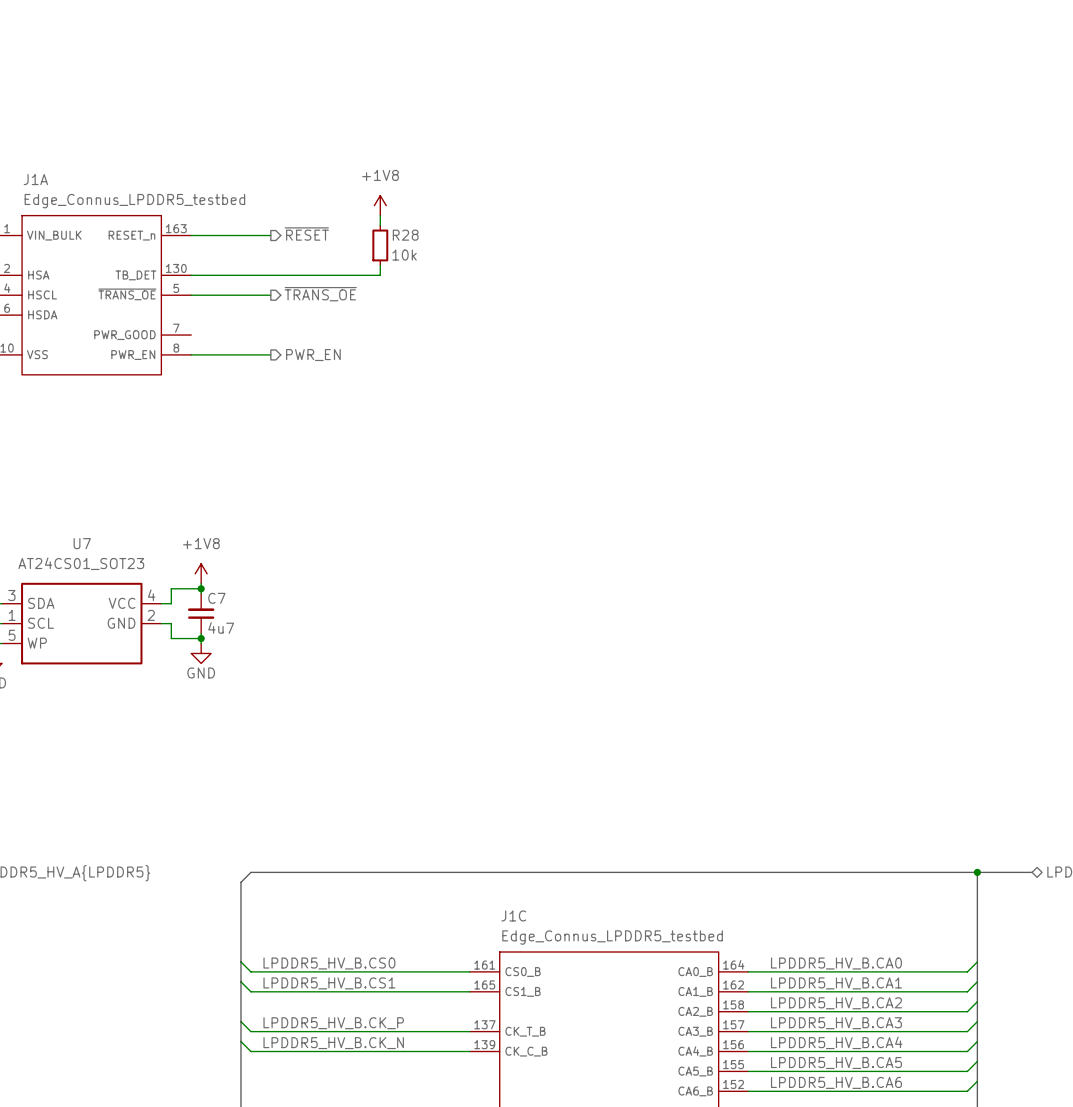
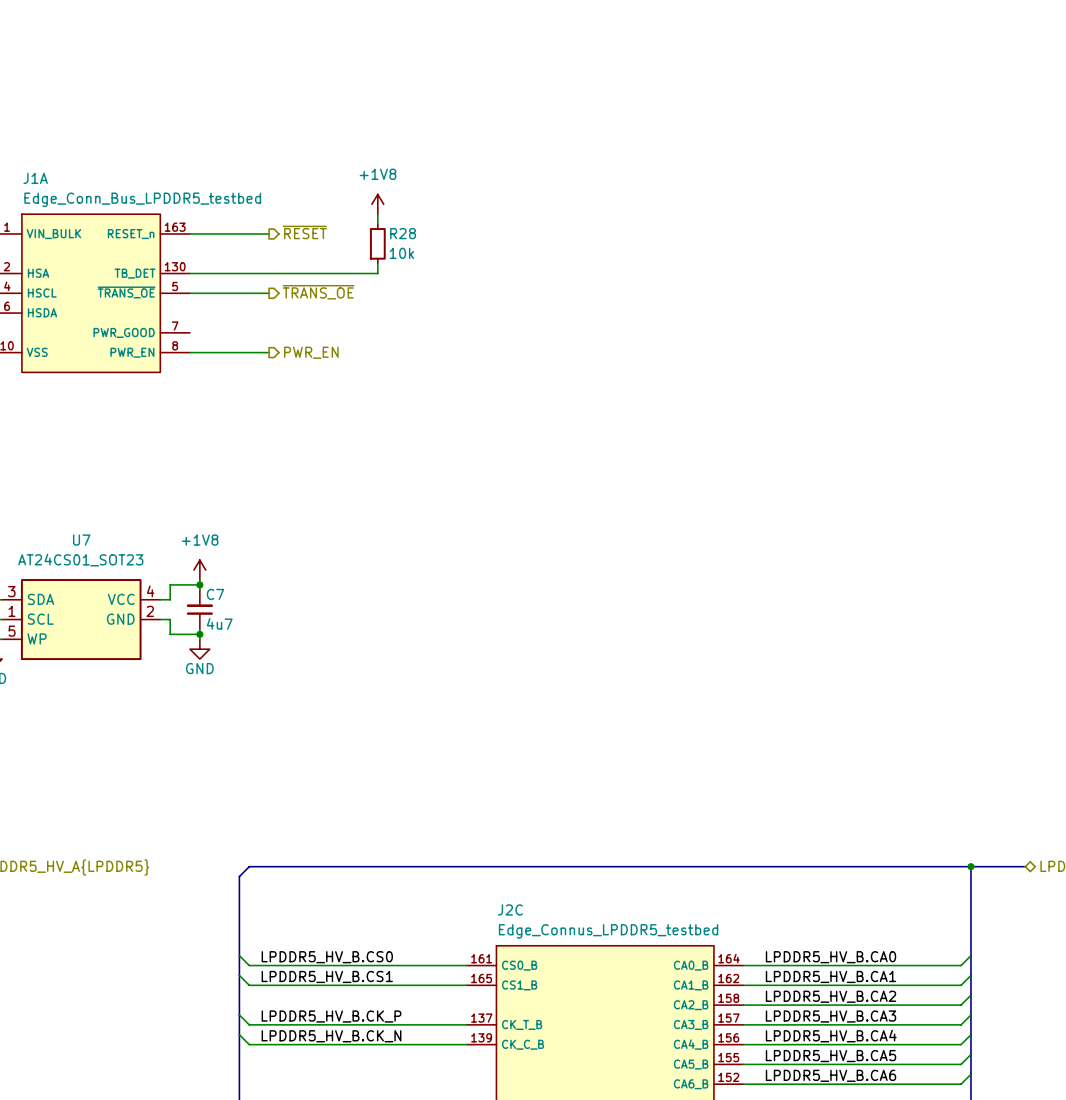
J1A value: Edge_Connus_LPDDR5_testbed (134, 201) -> Edge_Conn_Bus_LPDDR5_testbed (142, 199)
J1C name: J1C (513, 915) -> J2C (510, 909)

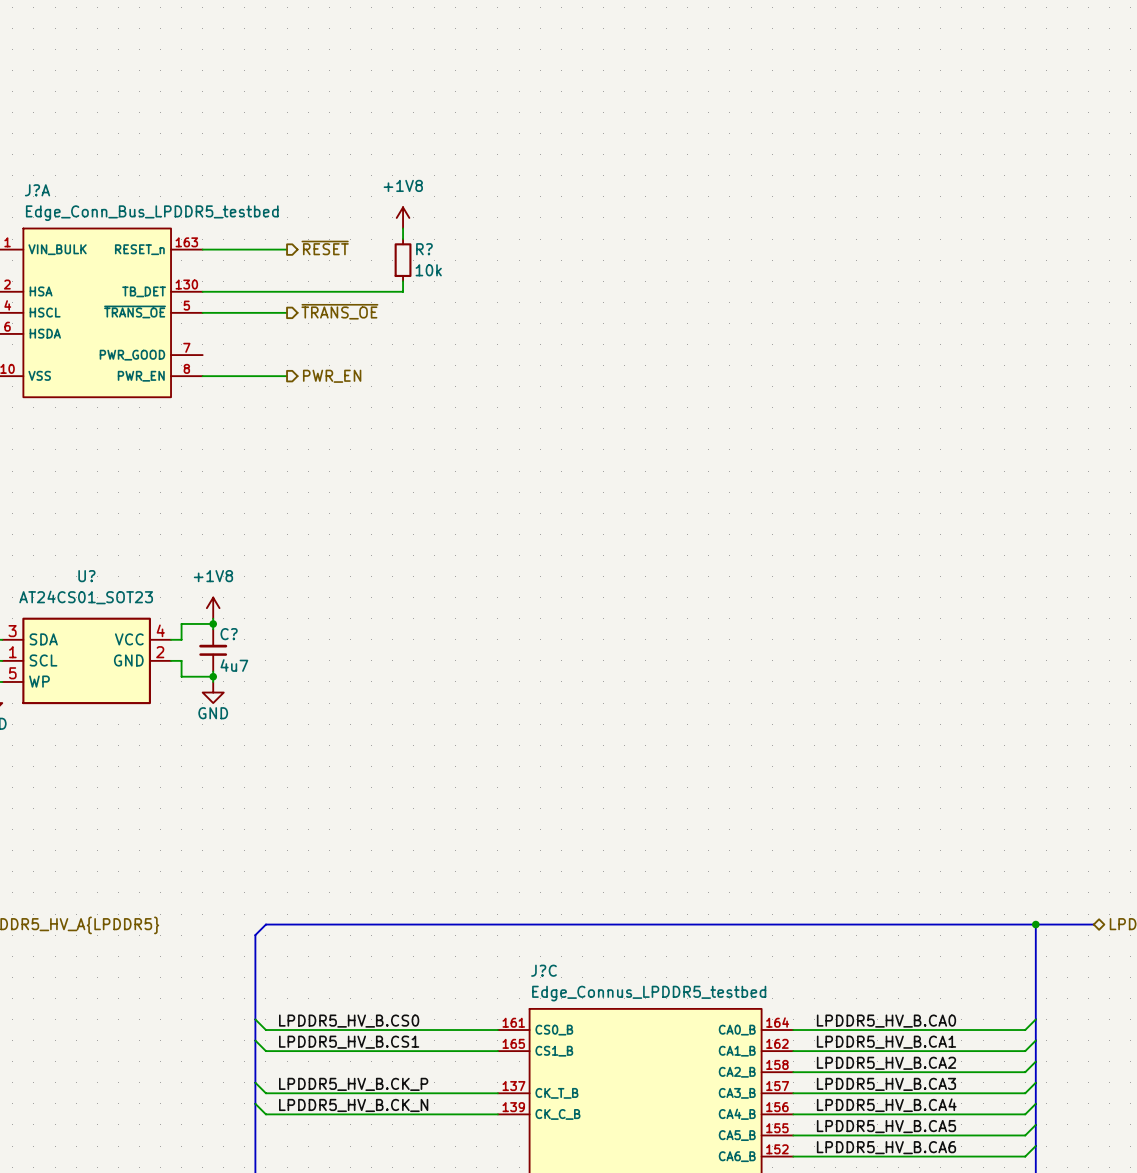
J1A name: J1A (35, 178) -> J?A (37, 190)
R28 name: R28 (403, 233) -> R? (424, 249)
U7 name: U7 (81, 540) -> U? (86, 576)
C7 name: C7 (215, 594) -> C? (229, 634)
J2C name: J2C (510, 909) -> J?C (543, 970)

